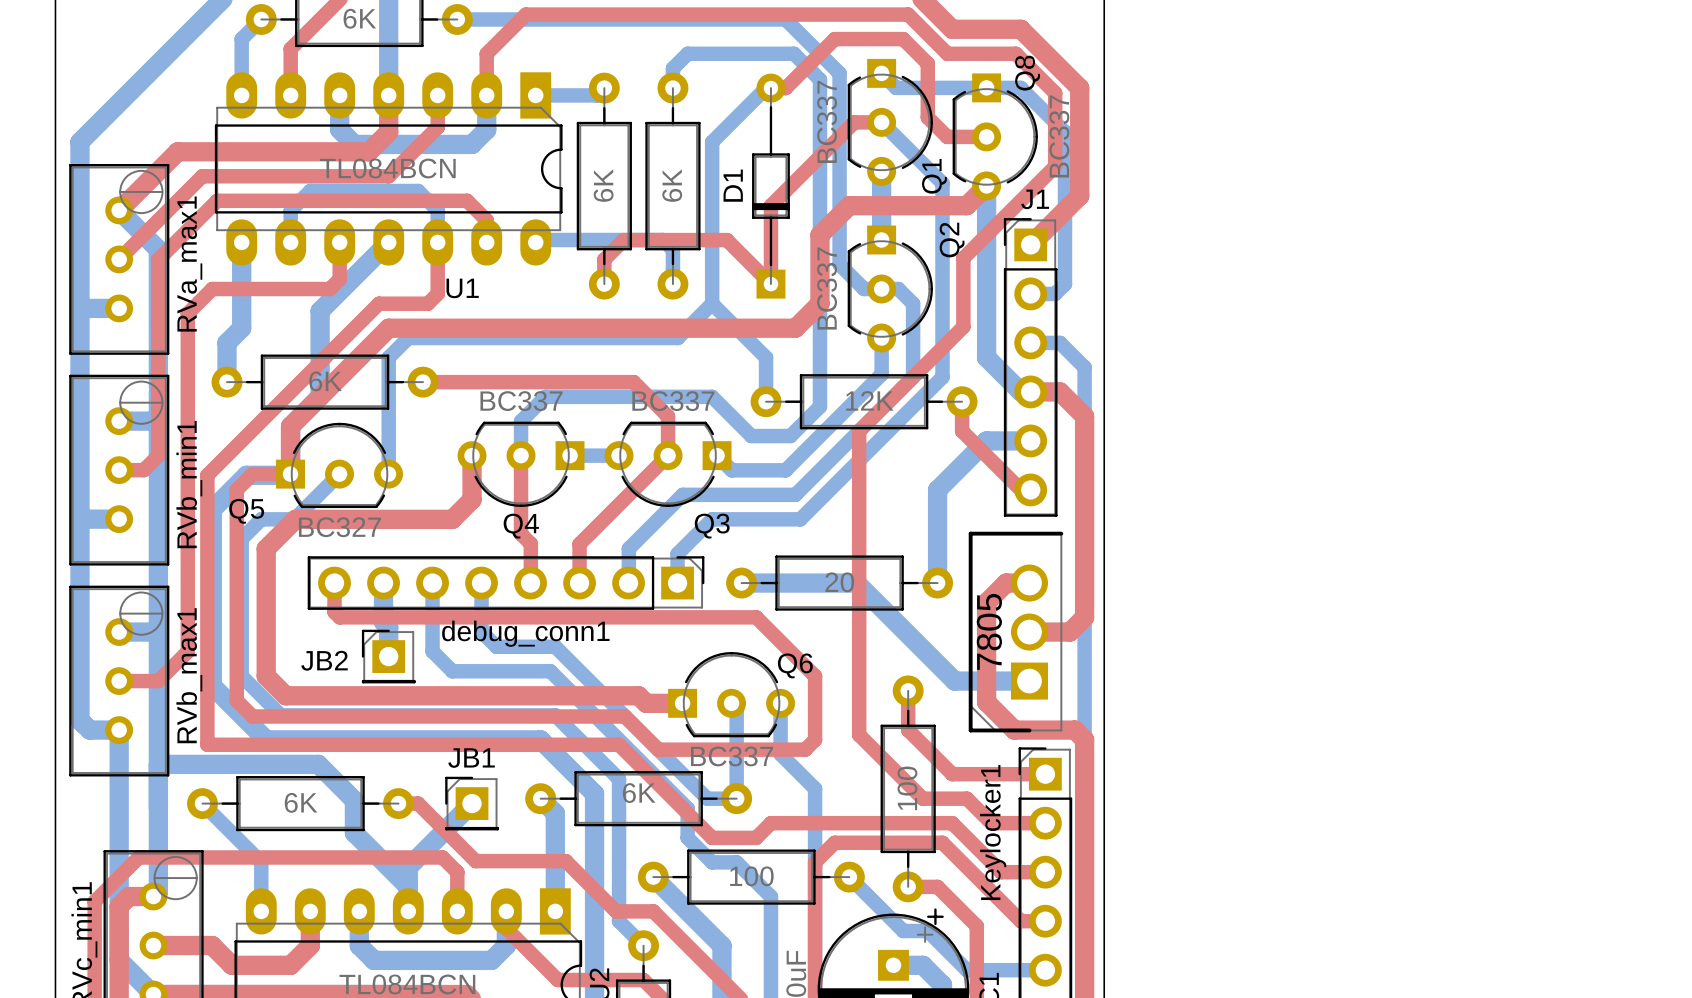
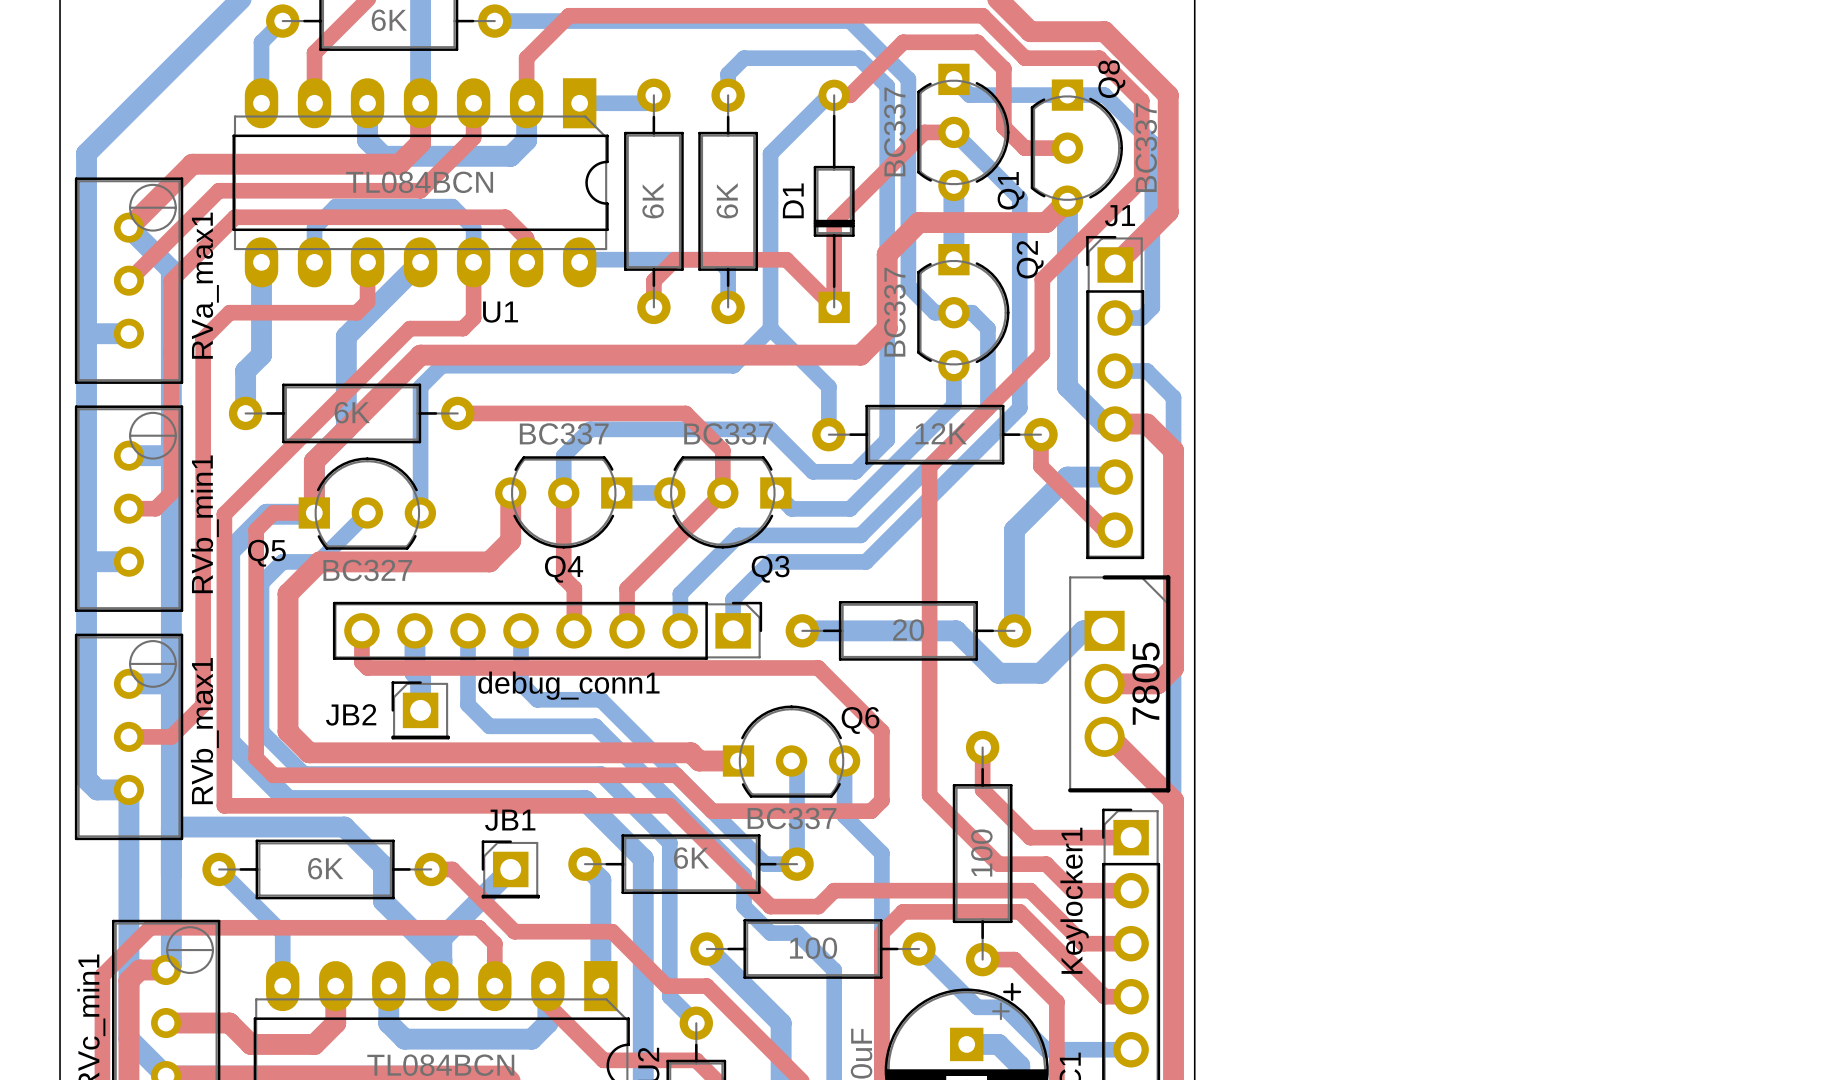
bottom track: (856, 583) (954, 681) (1029, 681) -> (926, 630) (956, 630) (998, 673) (1040, 673) (1083, 630) (1104, 630)
top track: (1033, 583) (1006, 583) (986, 602) (986, 702) (1014, 730) (1074, 730) -> (1104, 736) (1109, 736) (1162, 789)
part rotation: 0° (1016, 632) -> 180° (1119, 683)

